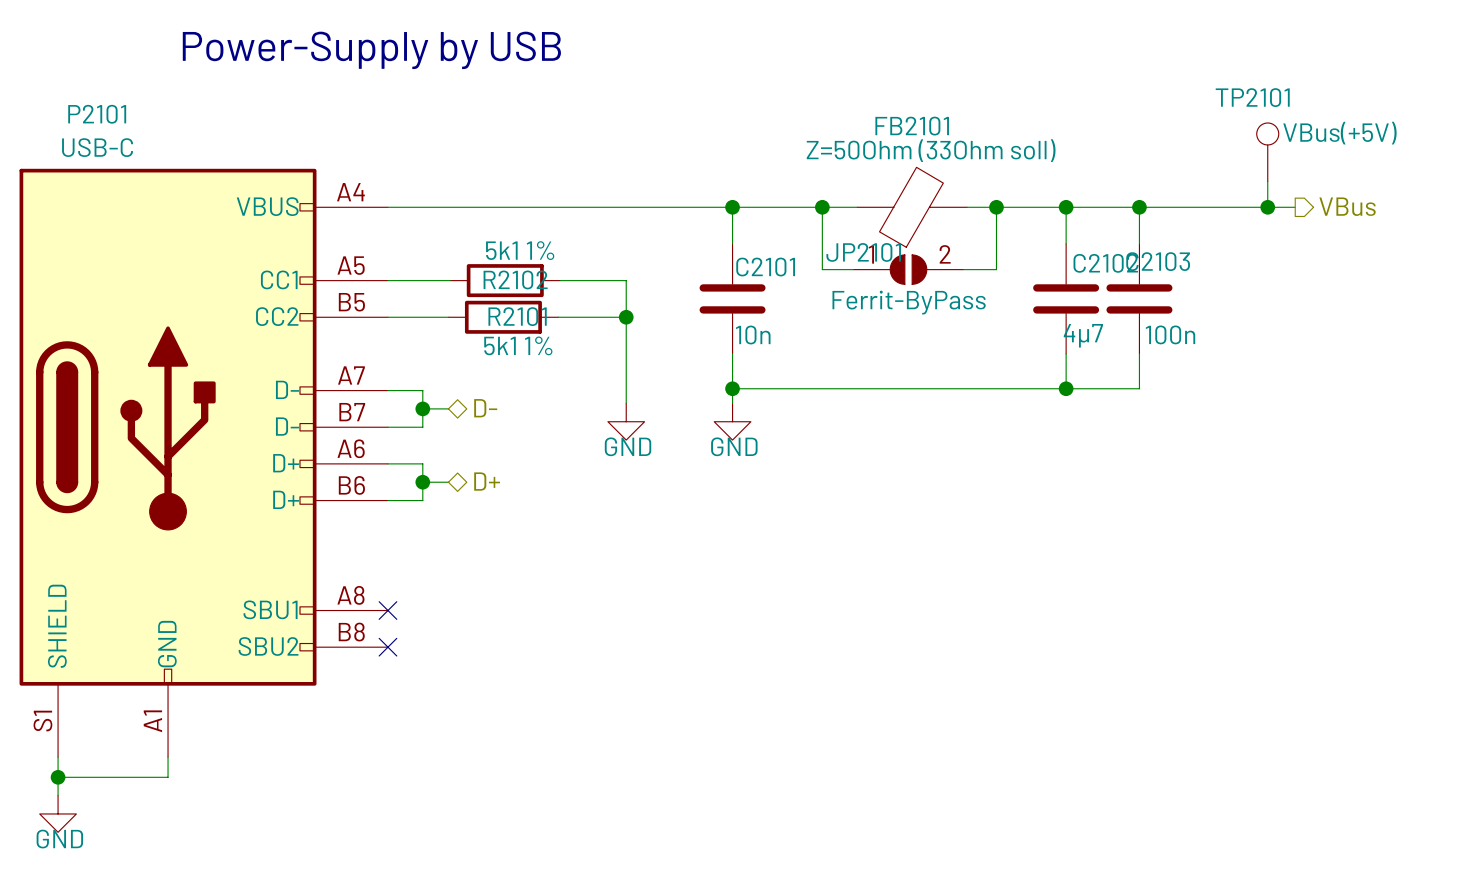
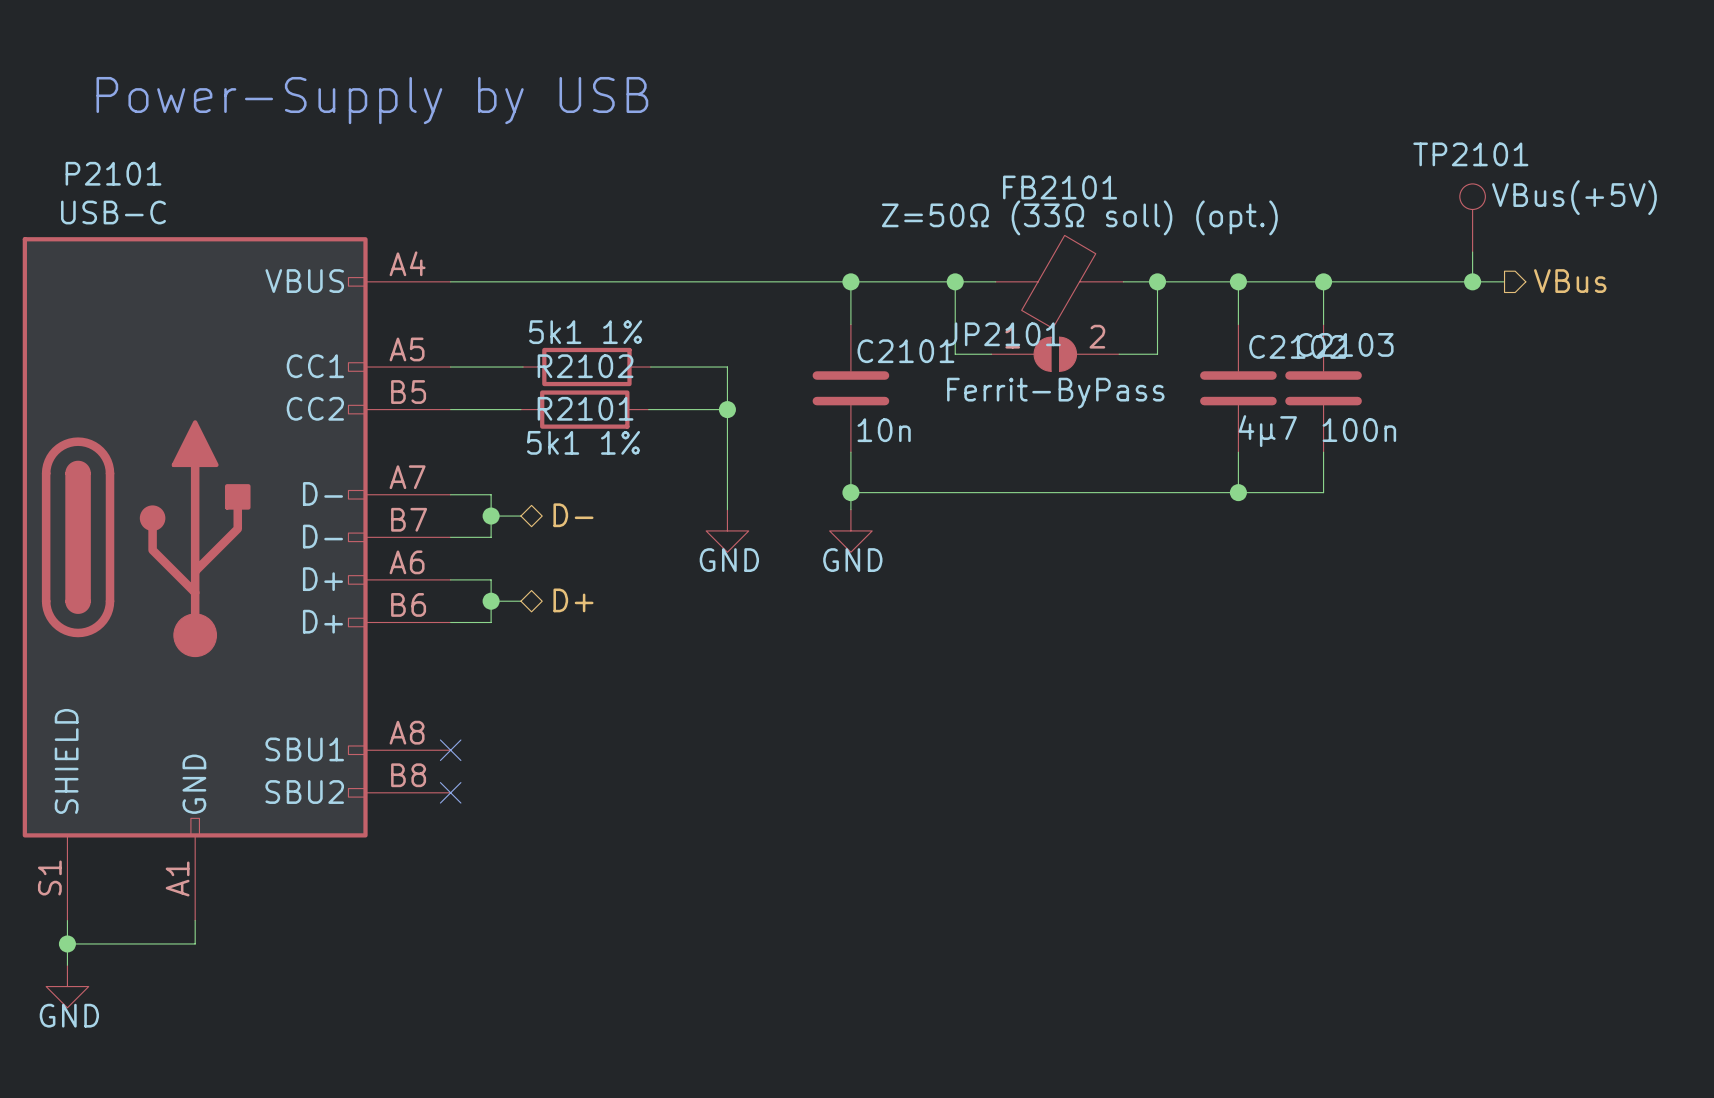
FB2101 value: Z=50Ohm (33Ohm soll) (931, 150) -> Z=50Ω (33Ω soll) (opt.) (1079, 217)

